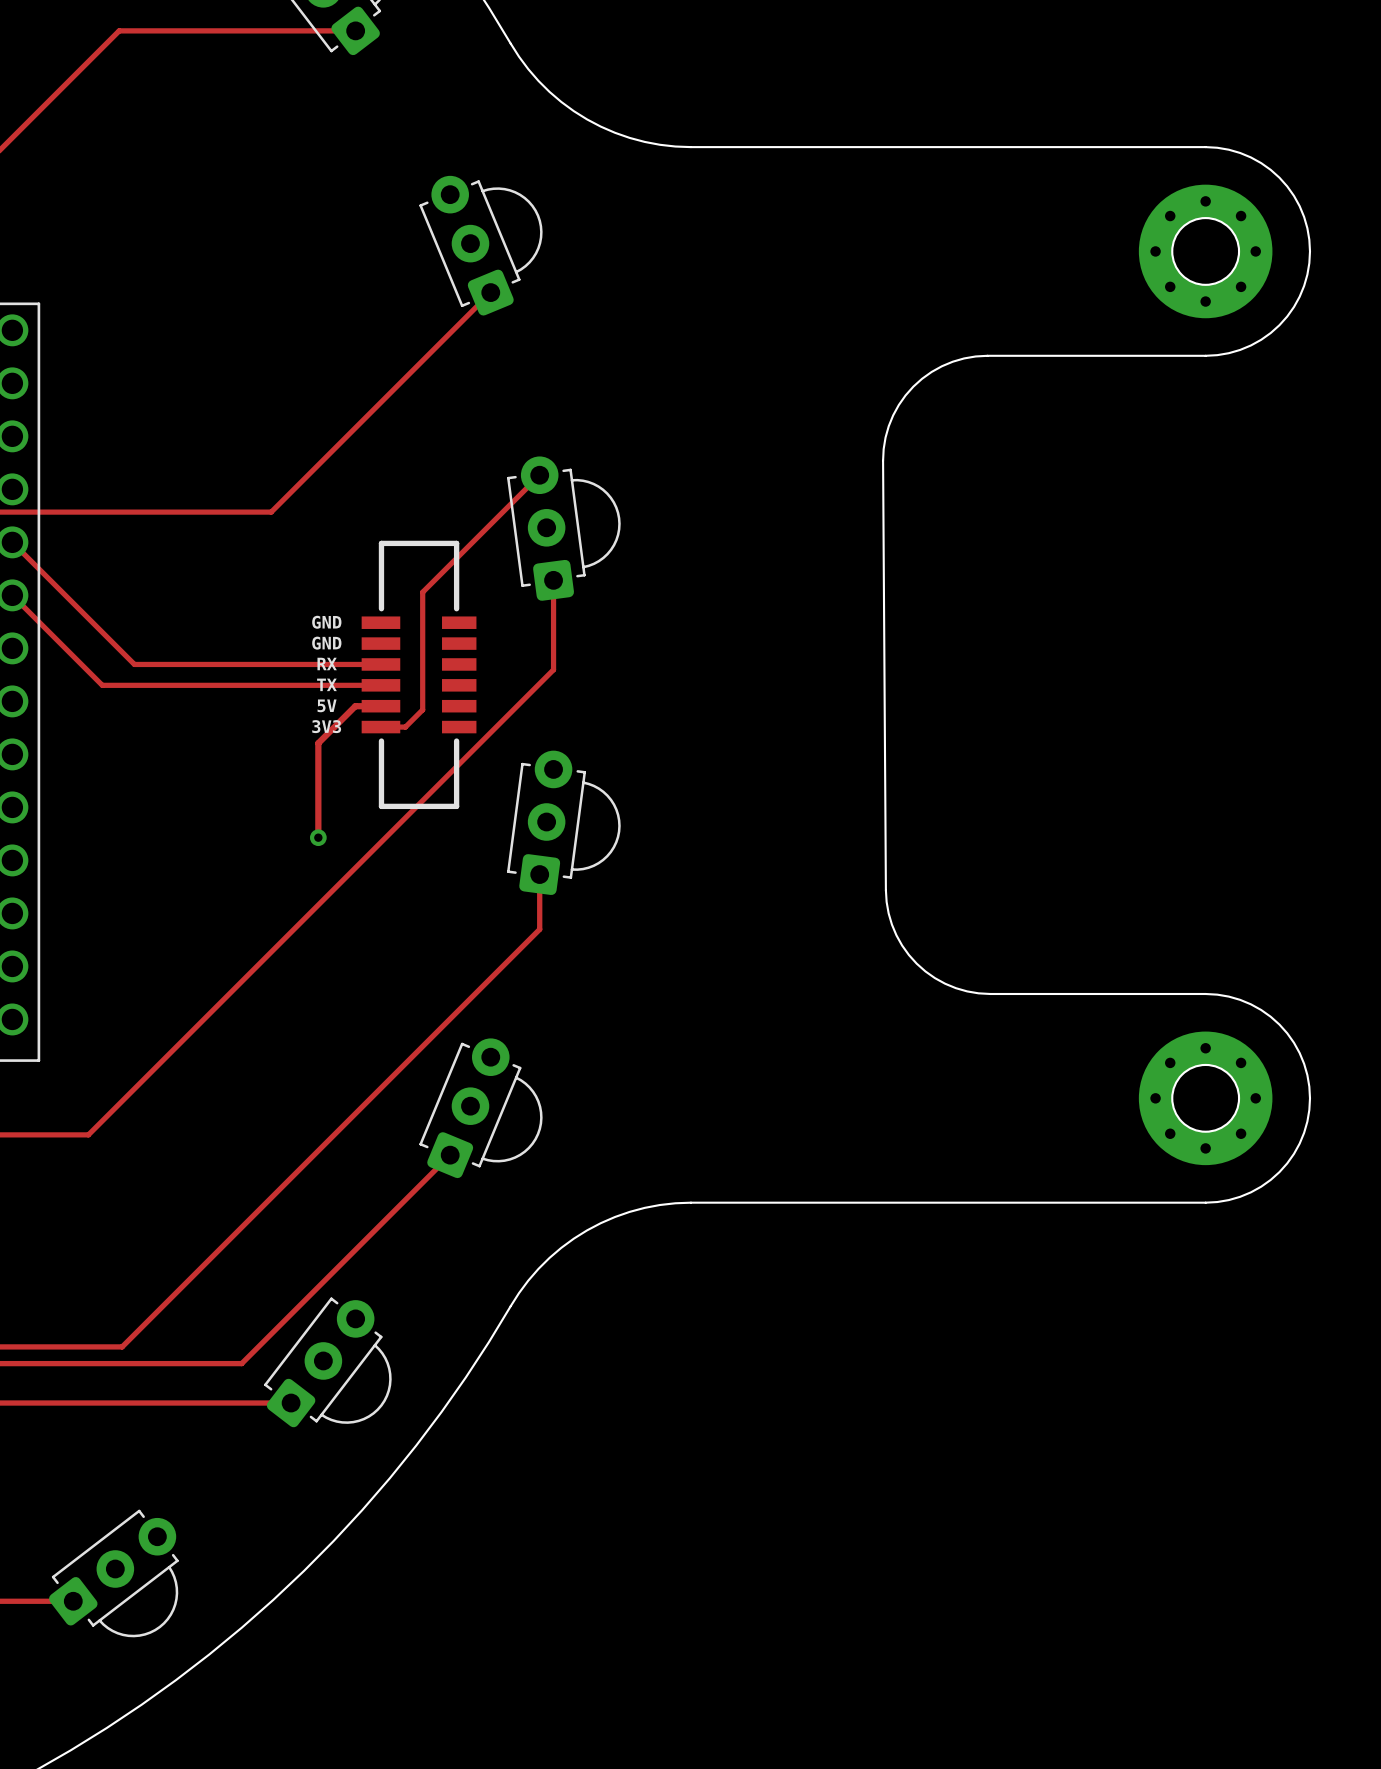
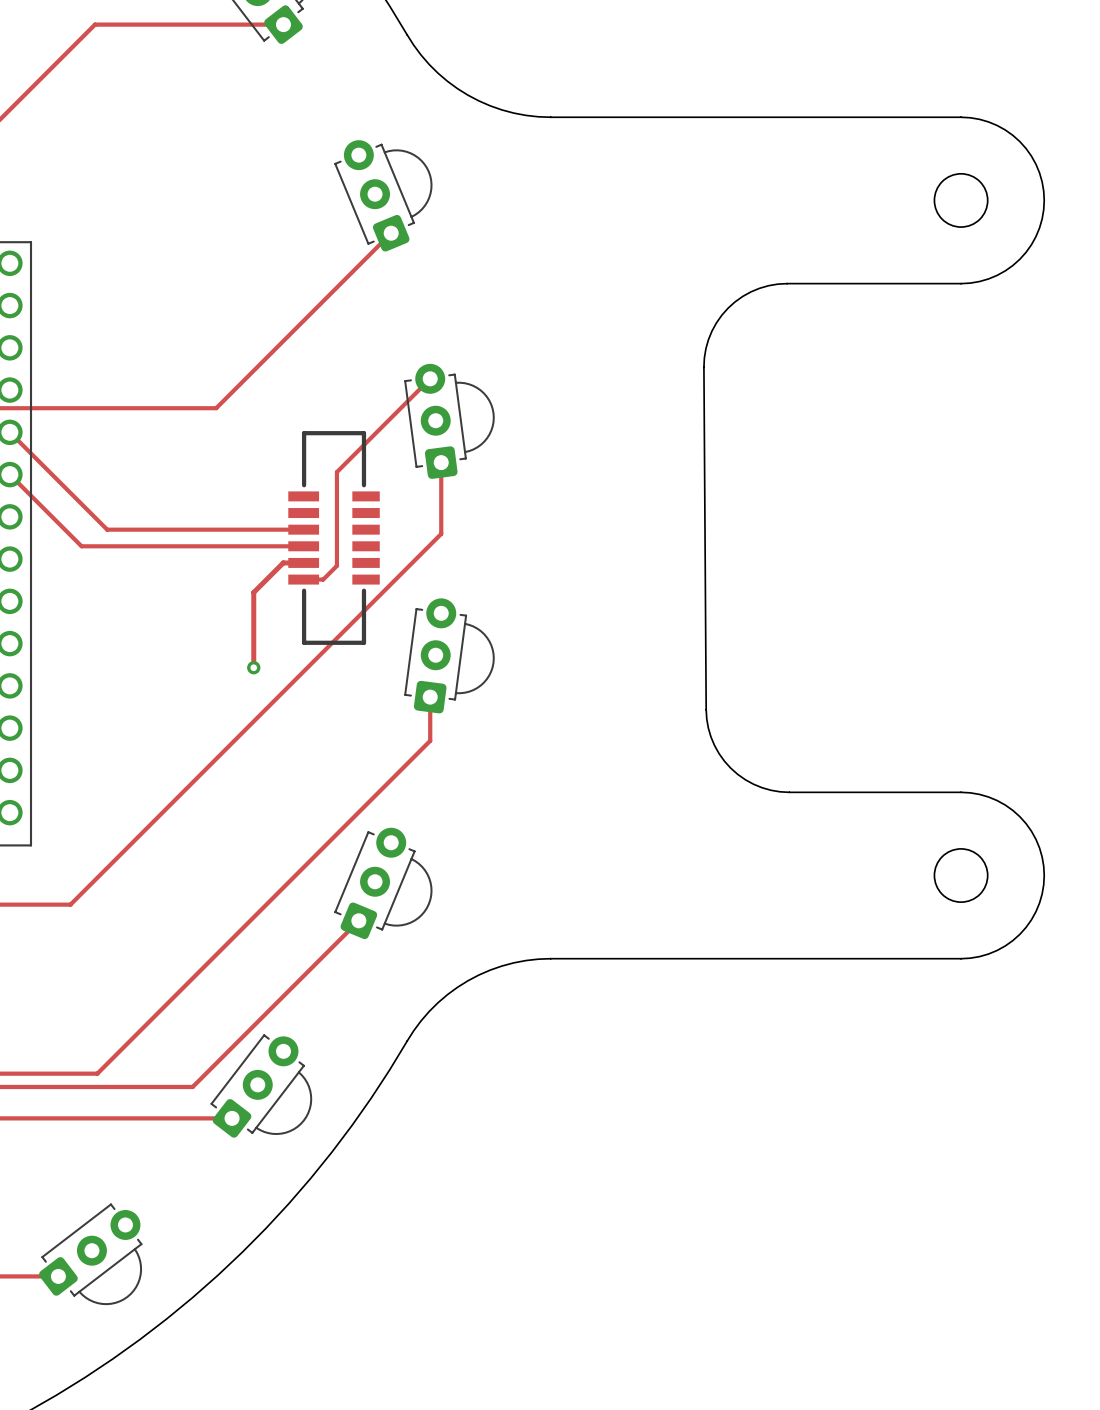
part: (1205, 251) -> none
text: GND (326, 622) -> none
text: GND (326, 643) -> none
text: RX (327, 663) -> none
text: TX (326, 684) -> none
text: 5V (327, 705) -> none
text: 3V3 (326, 726) -> none
part: (1205, 1098) -> none

